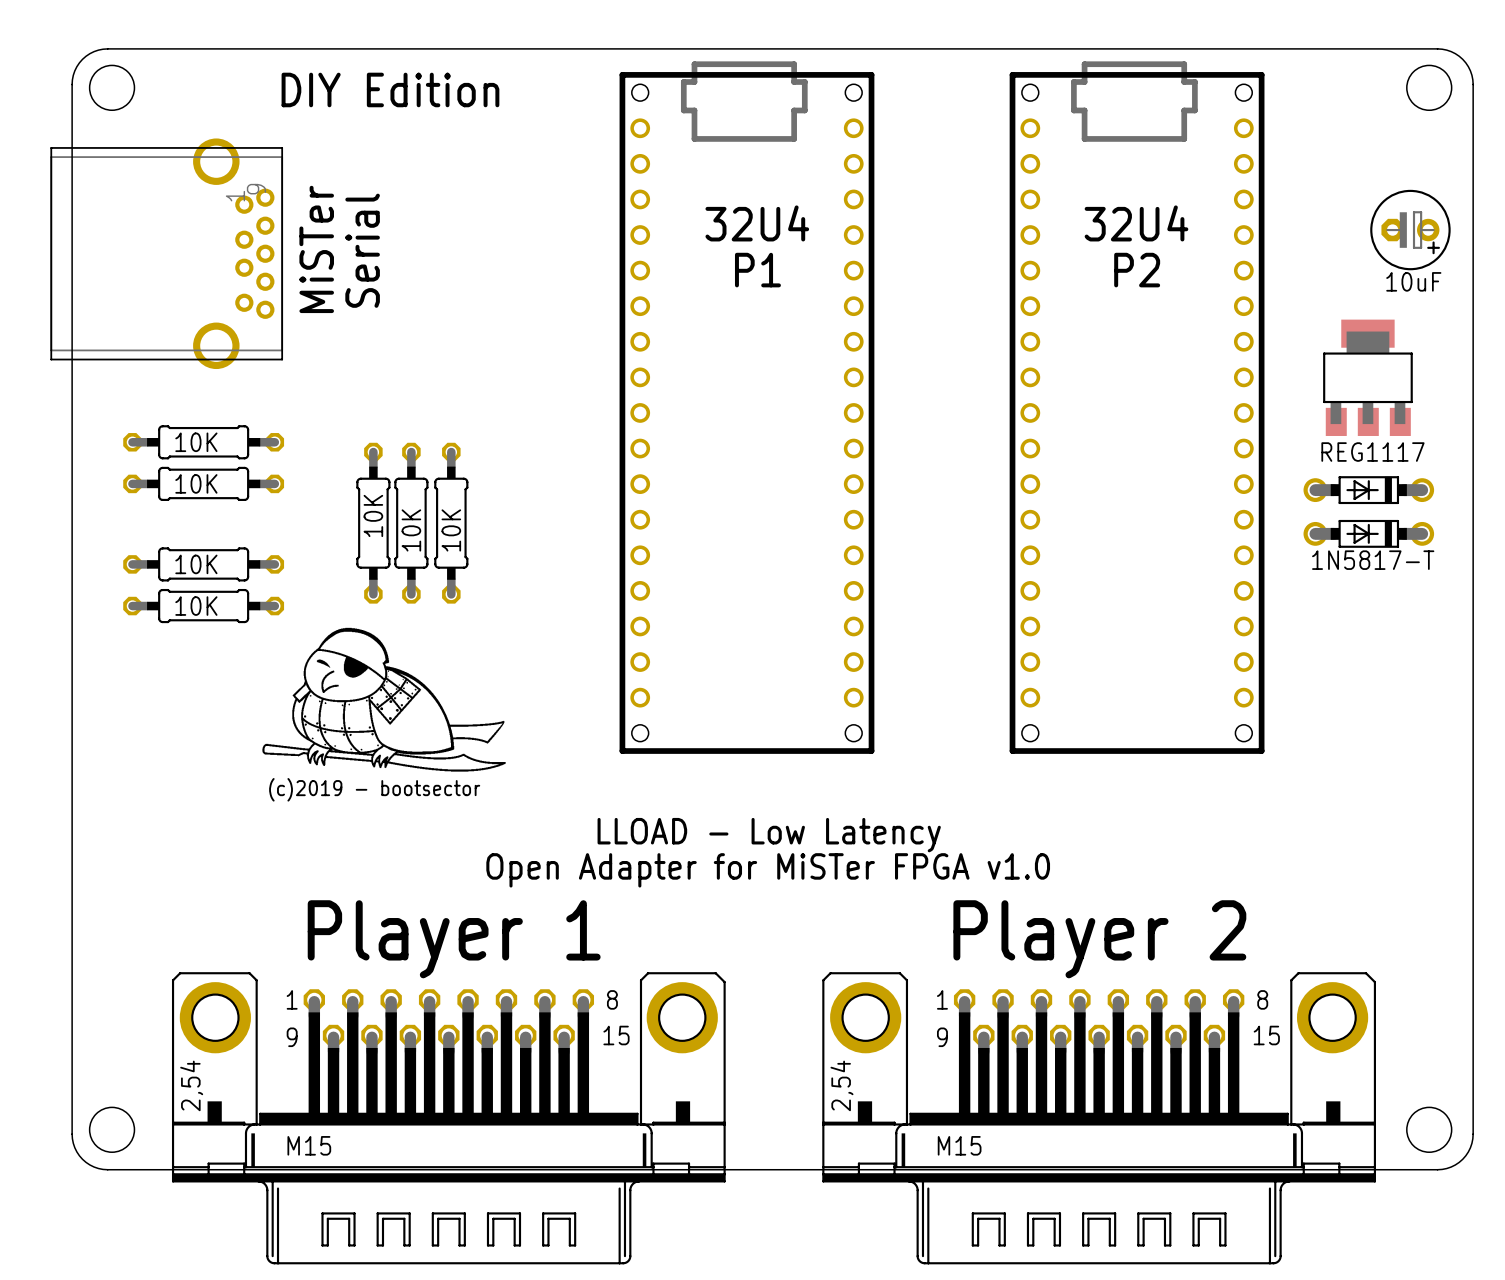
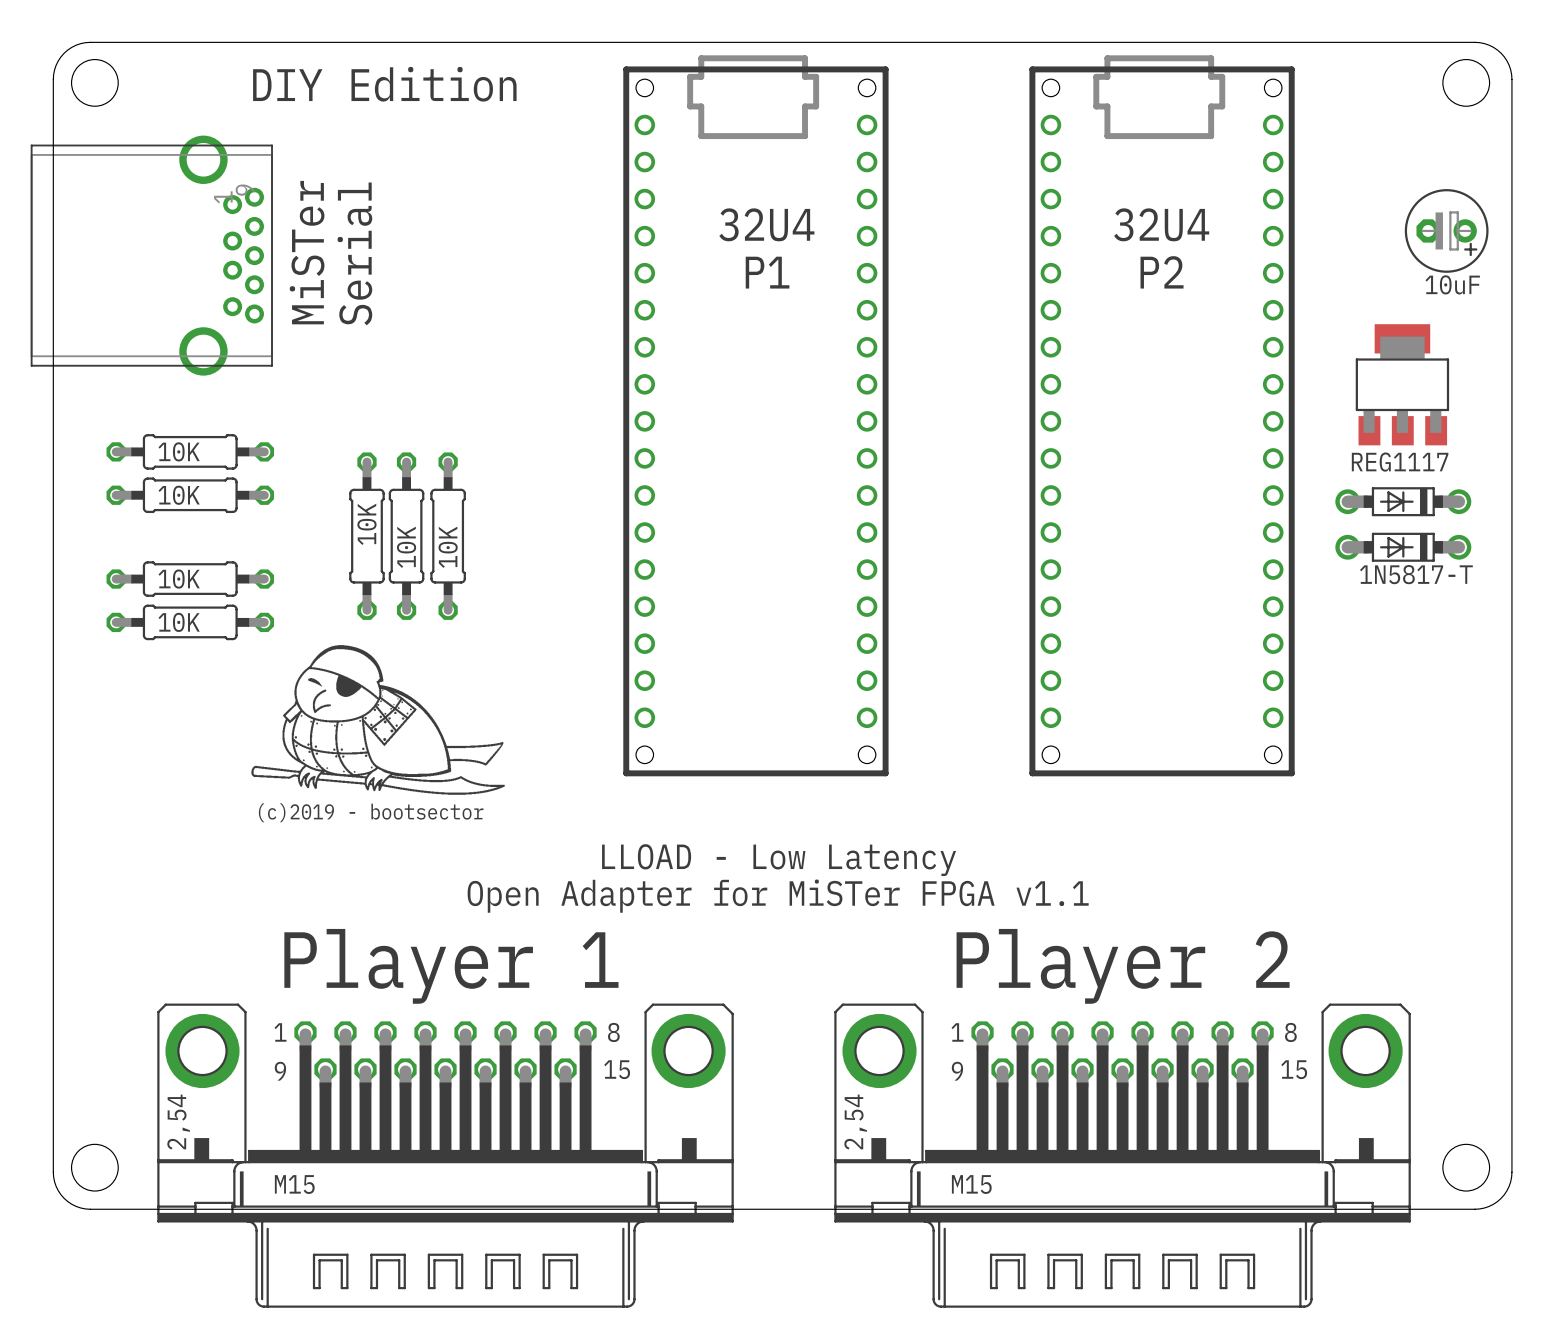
text: Open Adapter for MiSTer FPGA v1.0 (768, 870) -> Open Adapter for MiSTer FPGA v1.1 (778, 896)

